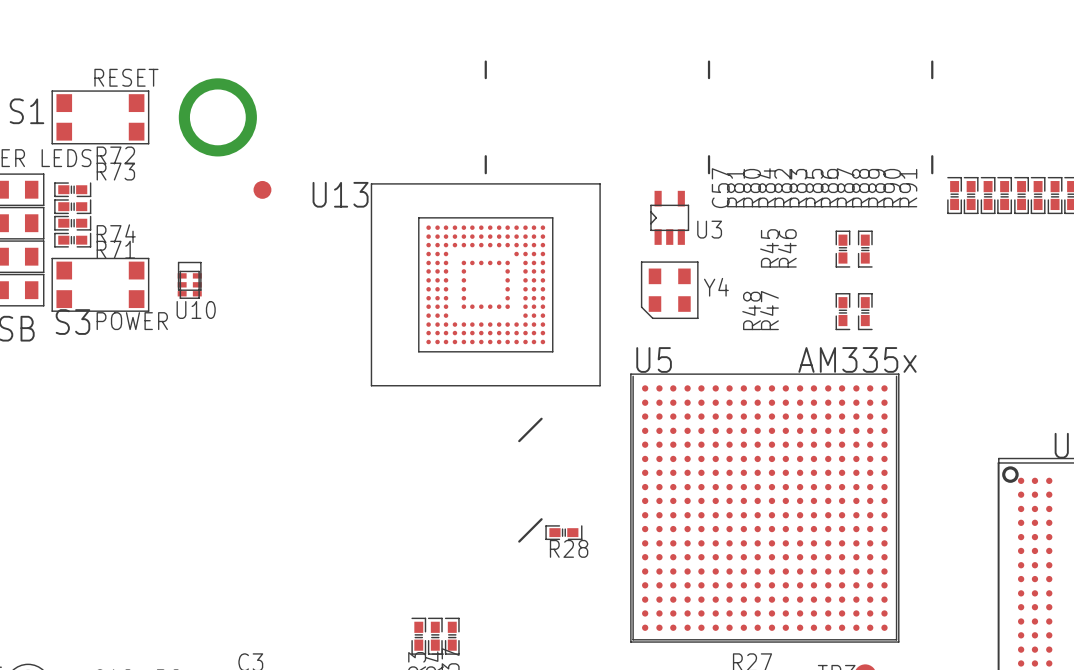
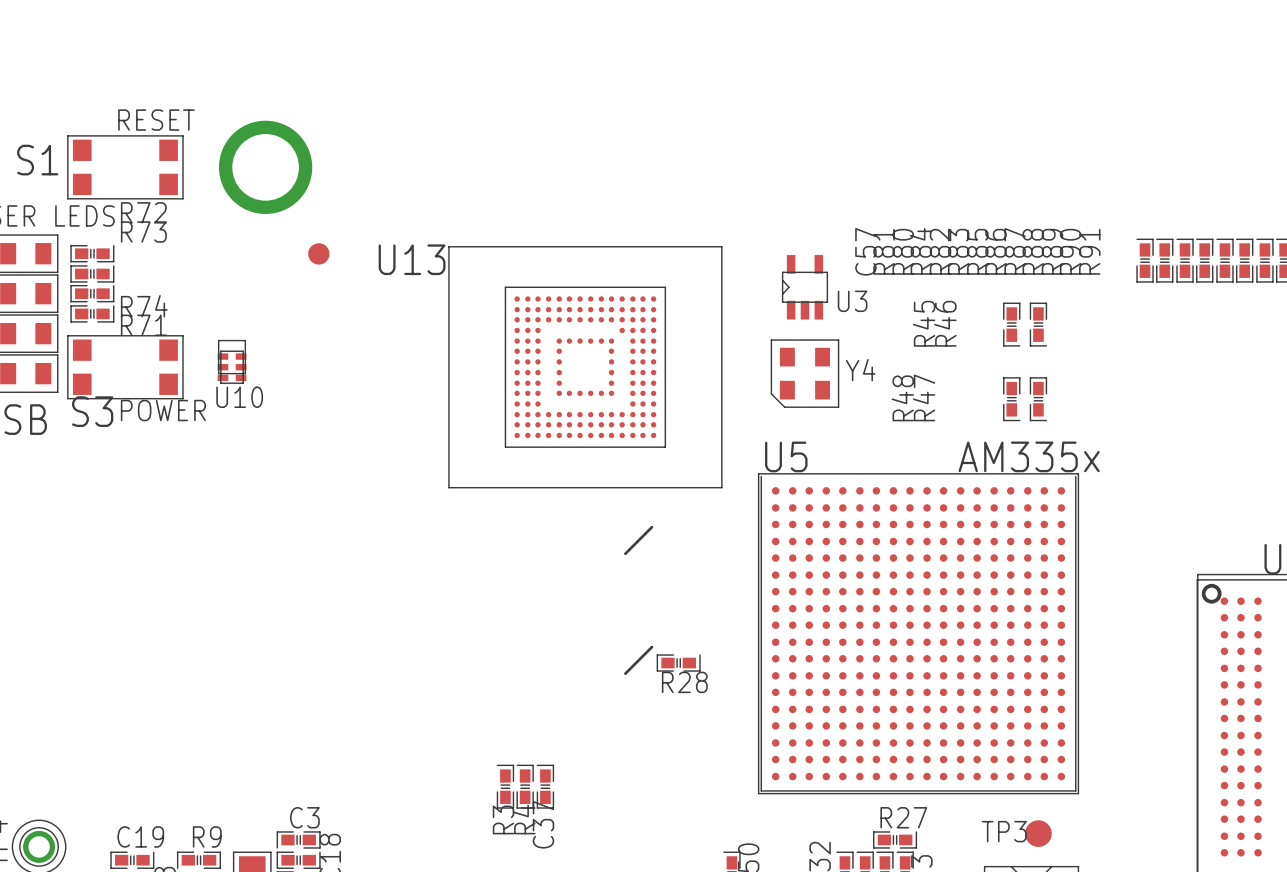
line: (485, 61) (485, 78) -> none
line: (709, 61) (709, 78) -> none
line: (932, 61) (932, 78) -> none
line: (485, 156) (485, 173) -> none
line: (709, 156) (709, 173) -> none
line: (932, 156) (932, 173) -> none

